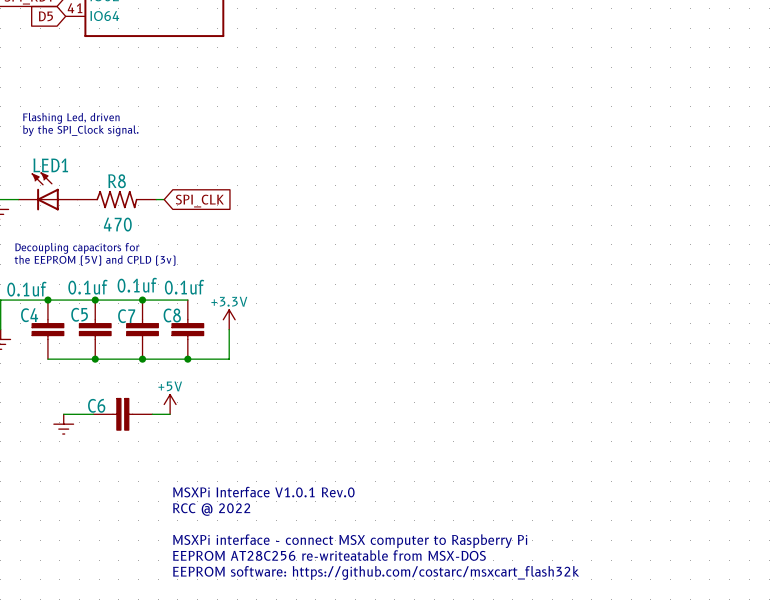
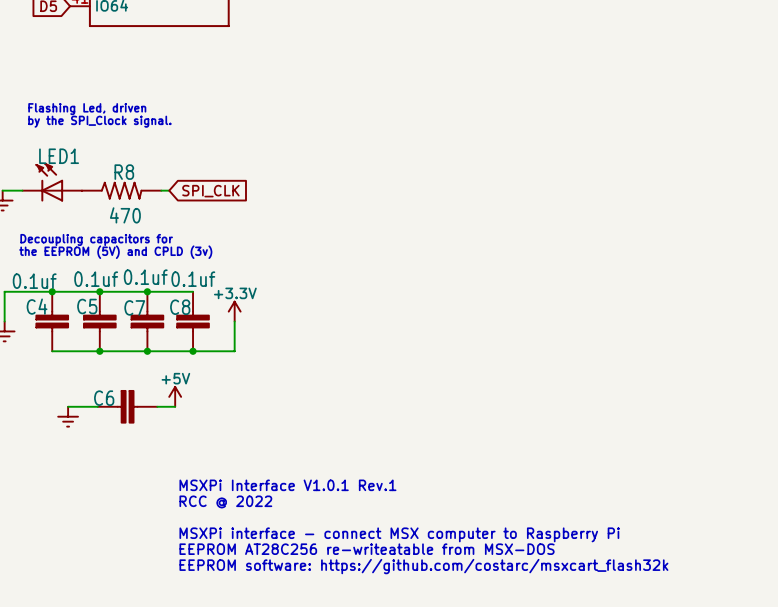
text: MSXPi Interface V1.0.1 Rev.0 (263, 492) -> MSXPi Interface V1.0.1 Rev.1 (287, 485)

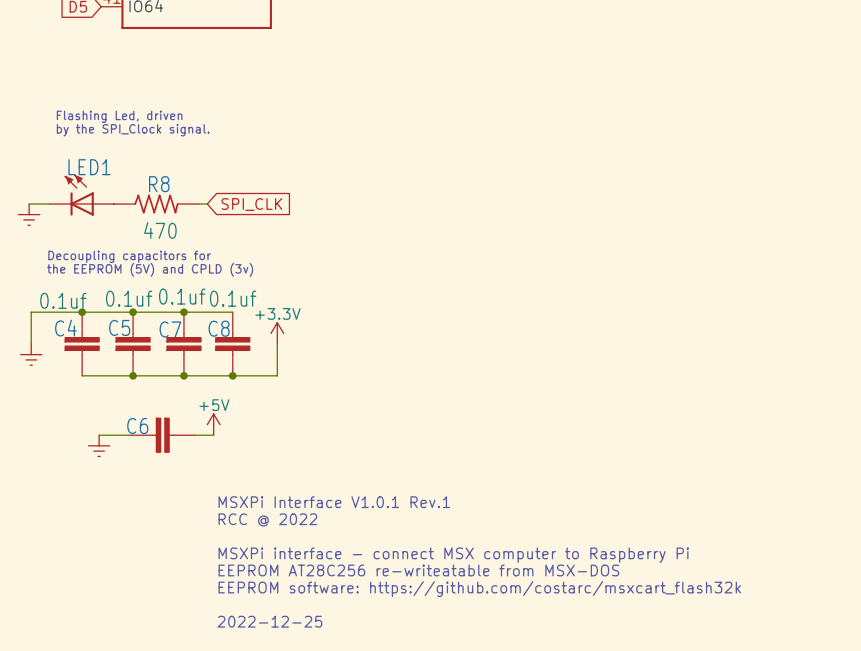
text: none -> MSXPi Interface V1.0.1 Rev.1 (334, 502)
text: MSXPi Interface V1.0.1 Rev.1 (287, 485) -> RCC @ 2022 (267, 520)
text: RCC @ 2022 (225, 502) -> none
text: none -> MSXPi interface - connect MSX computer to Raspberry Pi (453, 555)
text: MSXPi interface - connect MSX computer to Raspberry Pi (399, 534) -> EEPROM AT28C256 re-writeatable from MSX-DOS (418, 570)
text: EEPROM AT28C256 re-writeatable from MSX-DOS (367, 549) -> EEPROM software: https://github.com/costarc/msxcart_flash32k (479, 589)
text: EEPROM software: https://github.com/costarc/msxcart_flash32k (423, 566) -> none
text: none -> 2022-12-25 (269, 621)

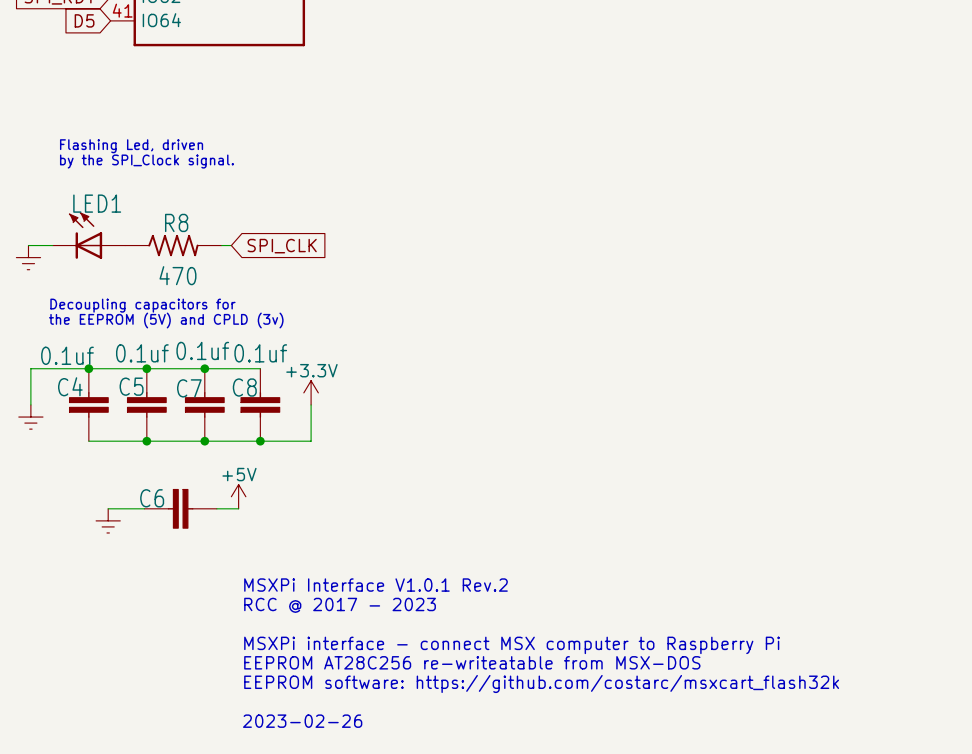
text: MSXPi Interface V1.0.1 Rev.1 (334, 502) -> MSXPi Interface V1.0.1 Rev.2 (375, 585)
text: RCC @ 2022 (267, 520) -> RCC @ 2017 - 2023 (340, 605)
text: 2022-12-25 (269, 621) -> 2023-02-26 (302, 721)

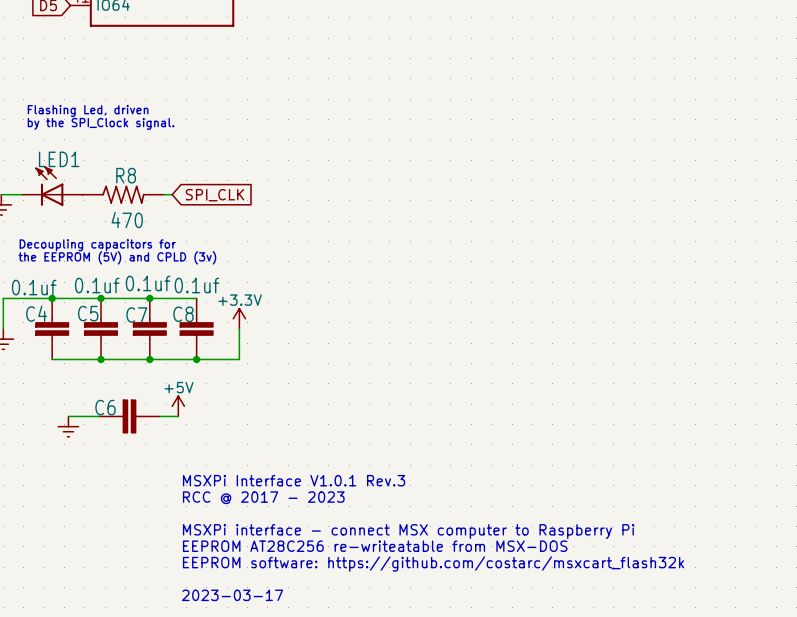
text: MSXPi Interface V1.0.1 Rev.2 (375, 585) -> MSXPi Interface V1.0.1 Rev.3 (294, 480)
text: 2023-02-26 (302, 721) -> 2023-03-17 (232, 595)

